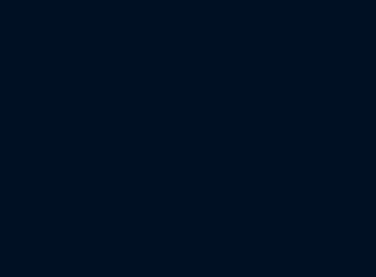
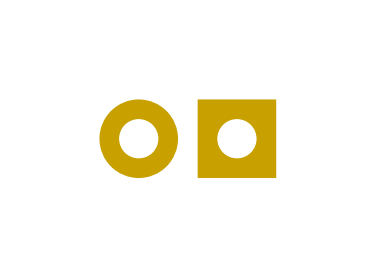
part: none -> (187, 138)

